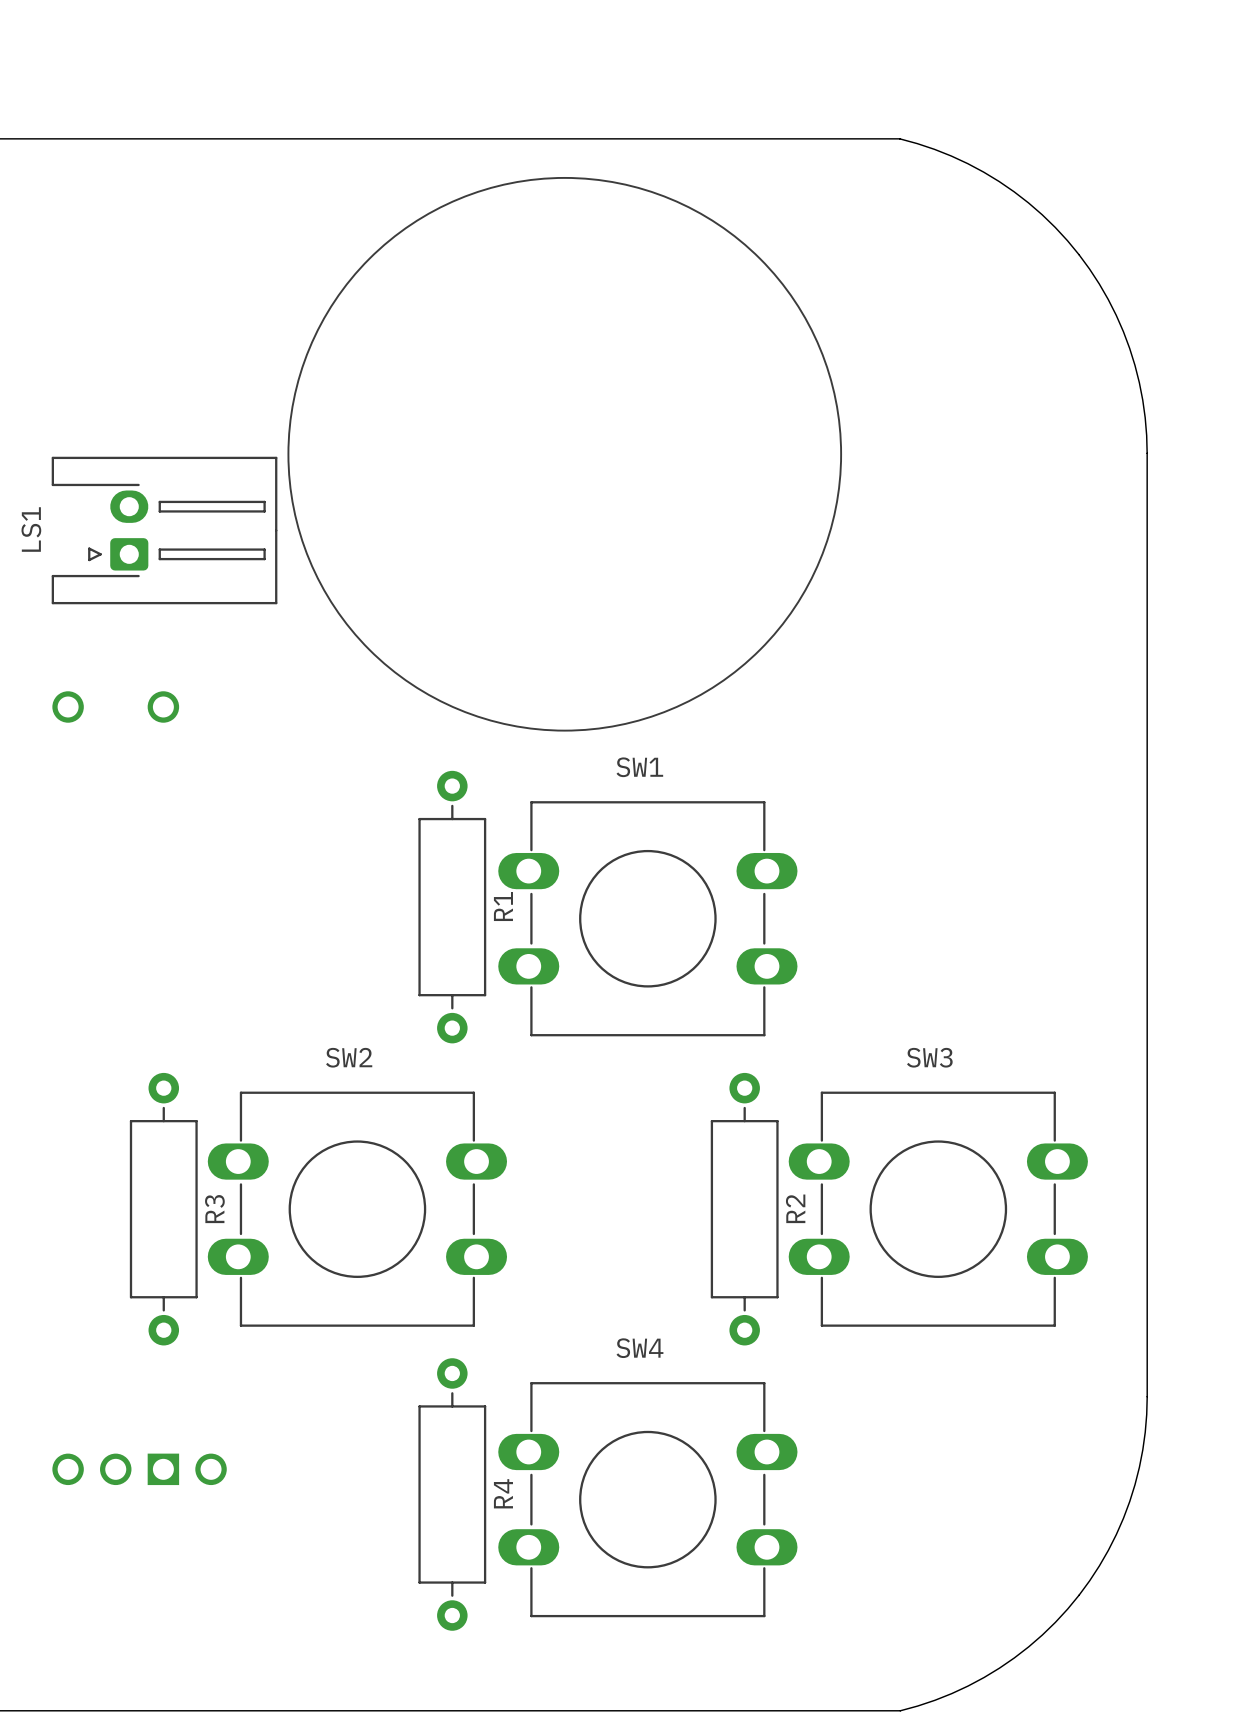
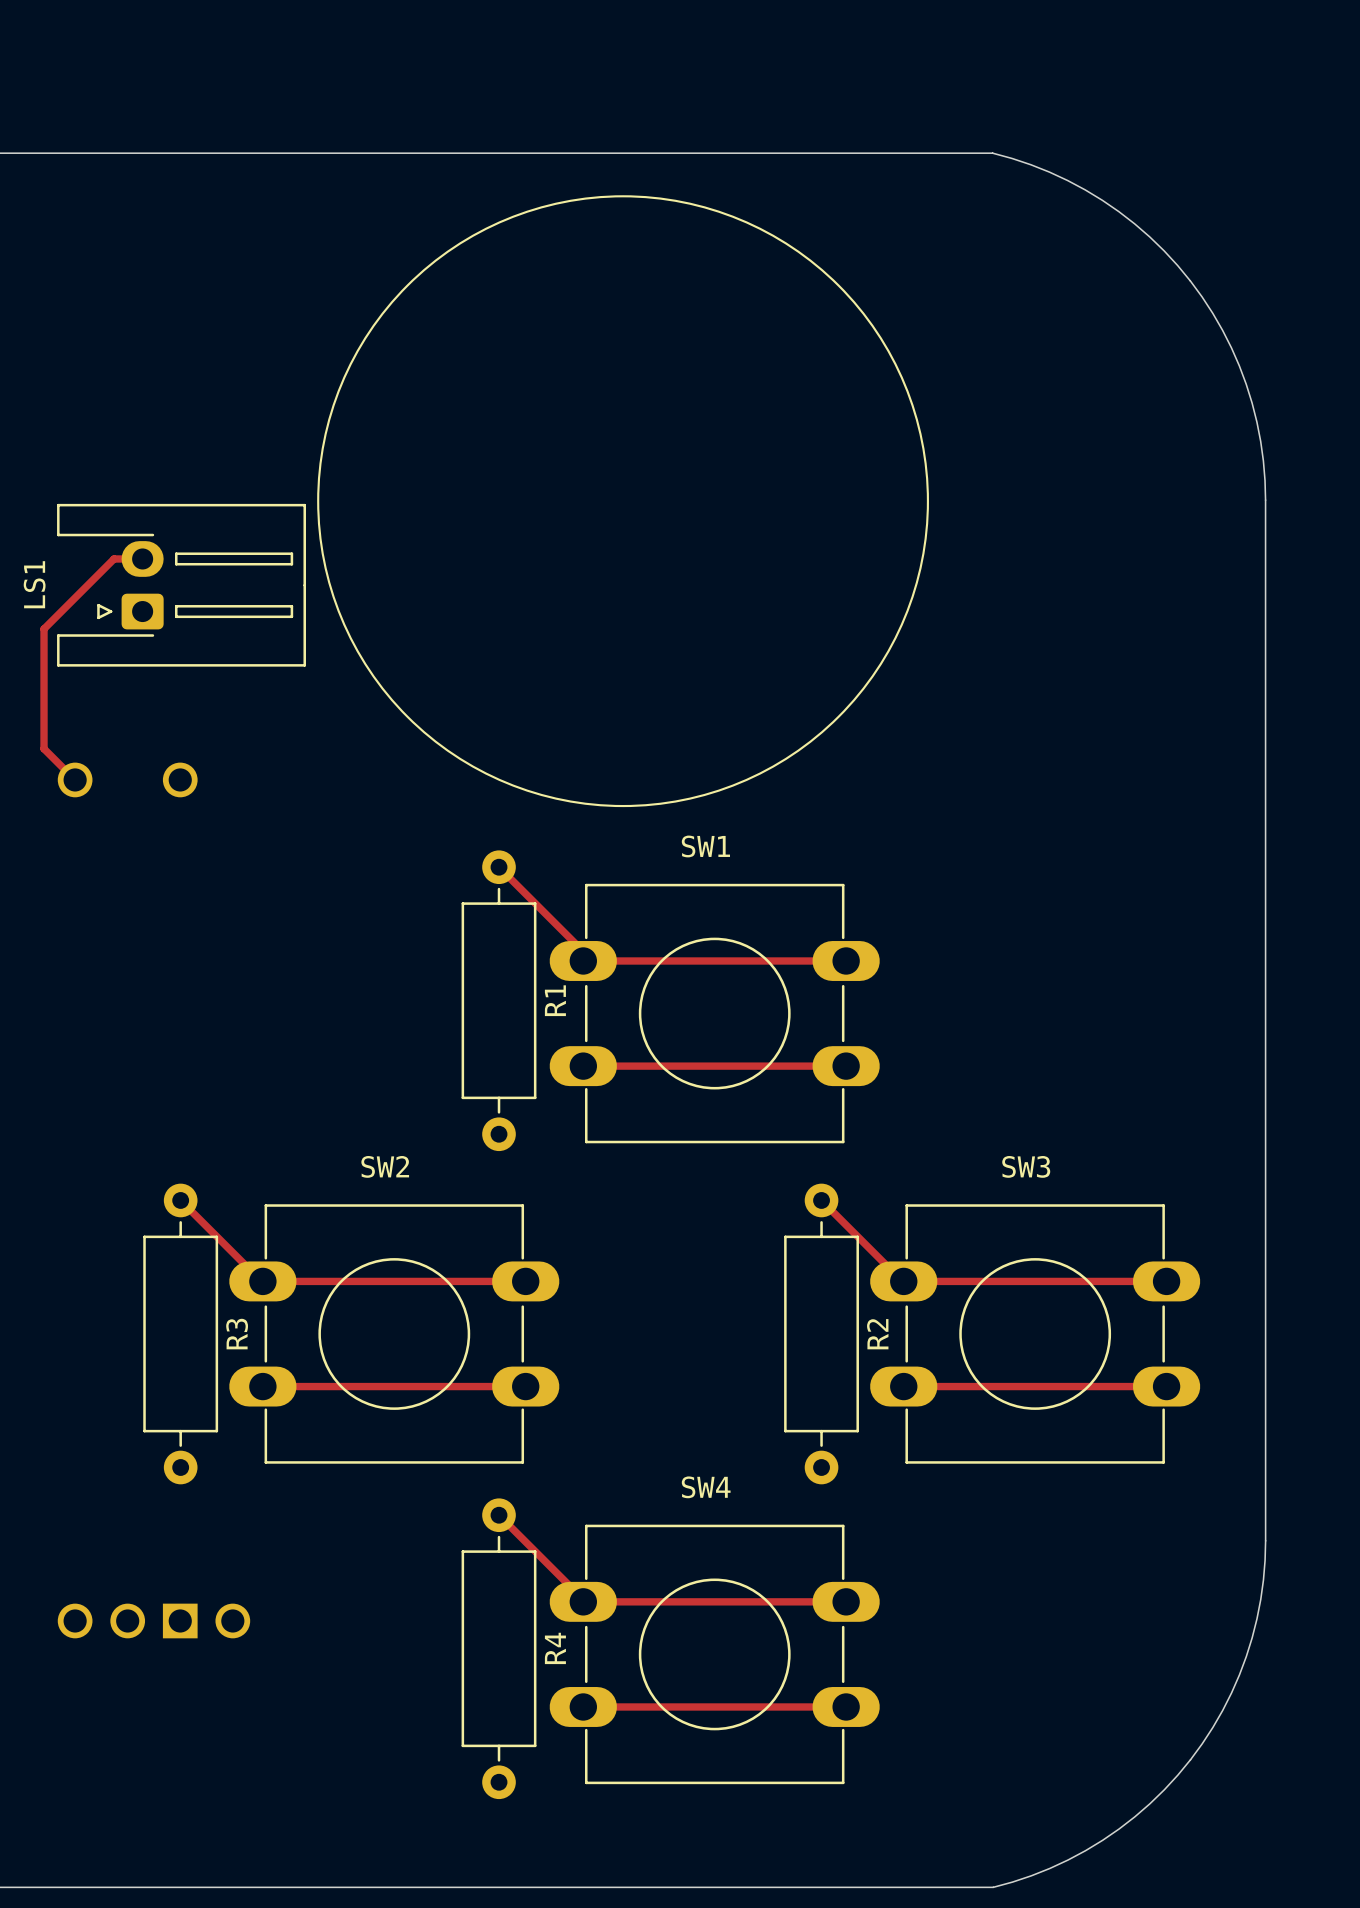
track: none -> (142, 558) (114, 558) (44, 628) (44, 748) (75, 779)
track: none -> (499, 867) (583, 951) (583, 960) (846, 960)
track: none -> (583, 1066) (846, 1066)
track: none -> (180, 1200) (261, 1281) (525, 1281)
track: none -> (821, 1200) (902, 1281) (1166, 1281)
track: none -> (262, 1386) (525, 1386)
track: none -> (903, 1386) (1166, 1386)
track: none -> (499, 1515) (583, 1599) (583, 1601) (846, 1601)
track: none -> (583, 1706) (846, 1706)

